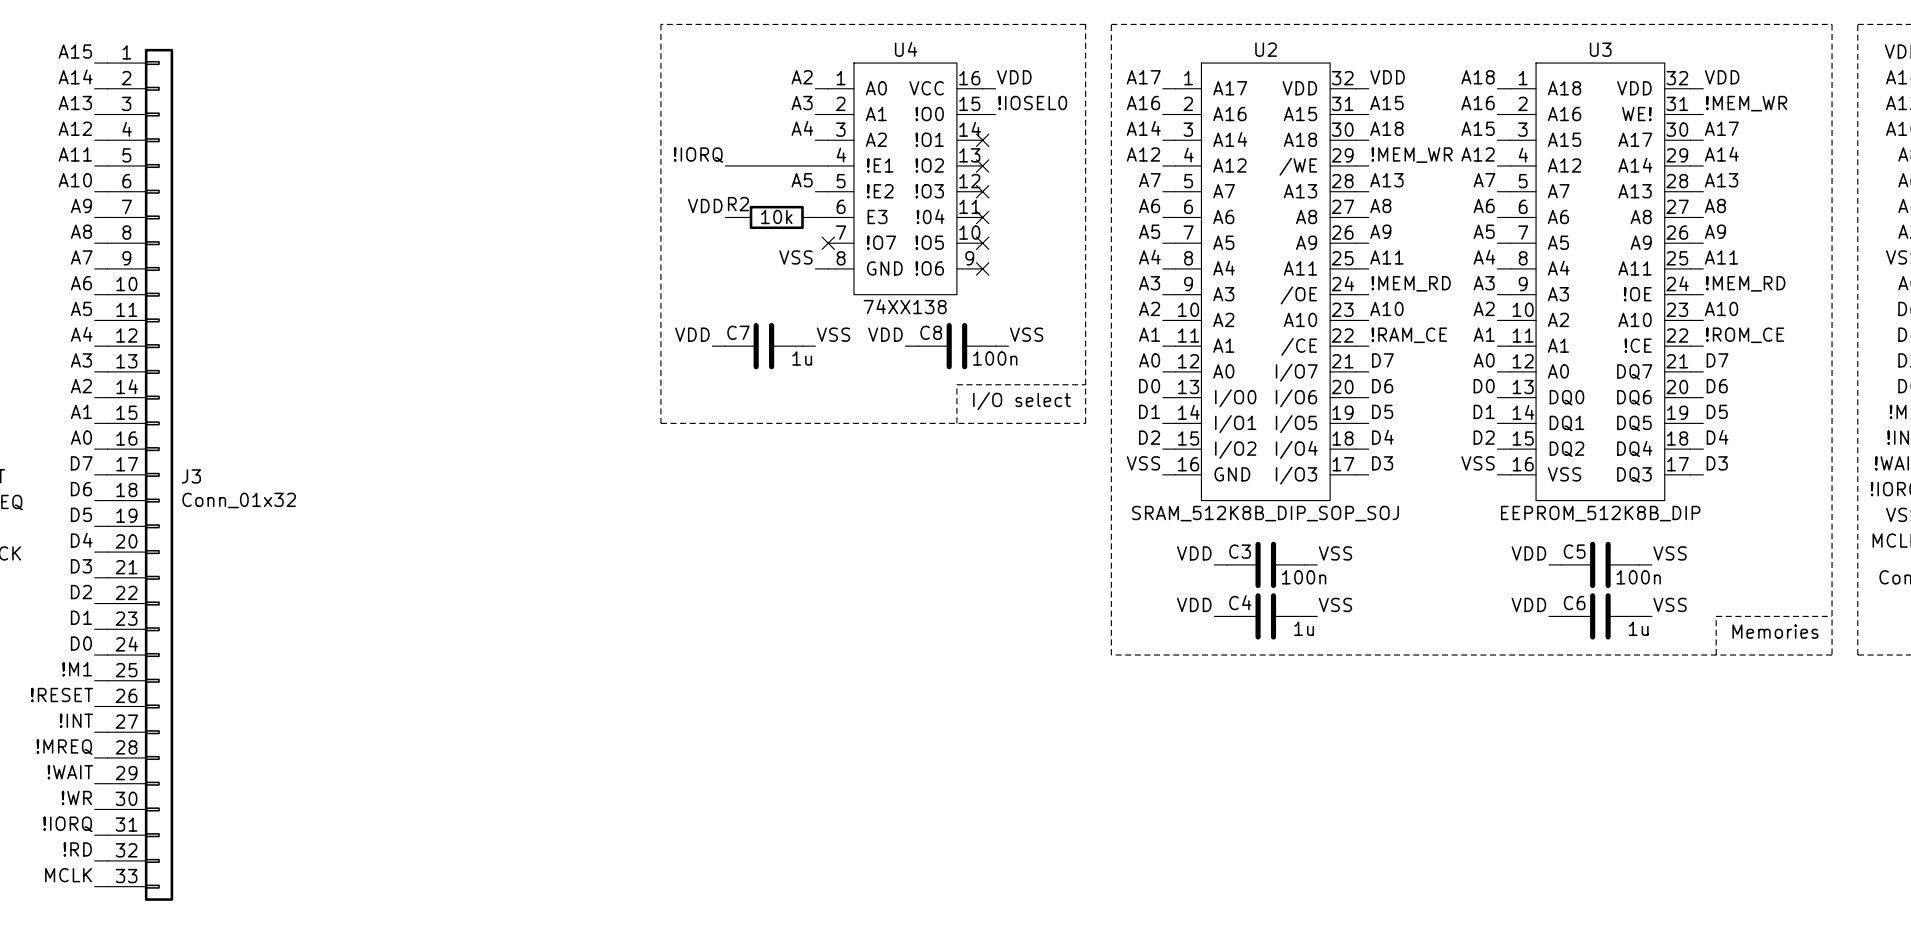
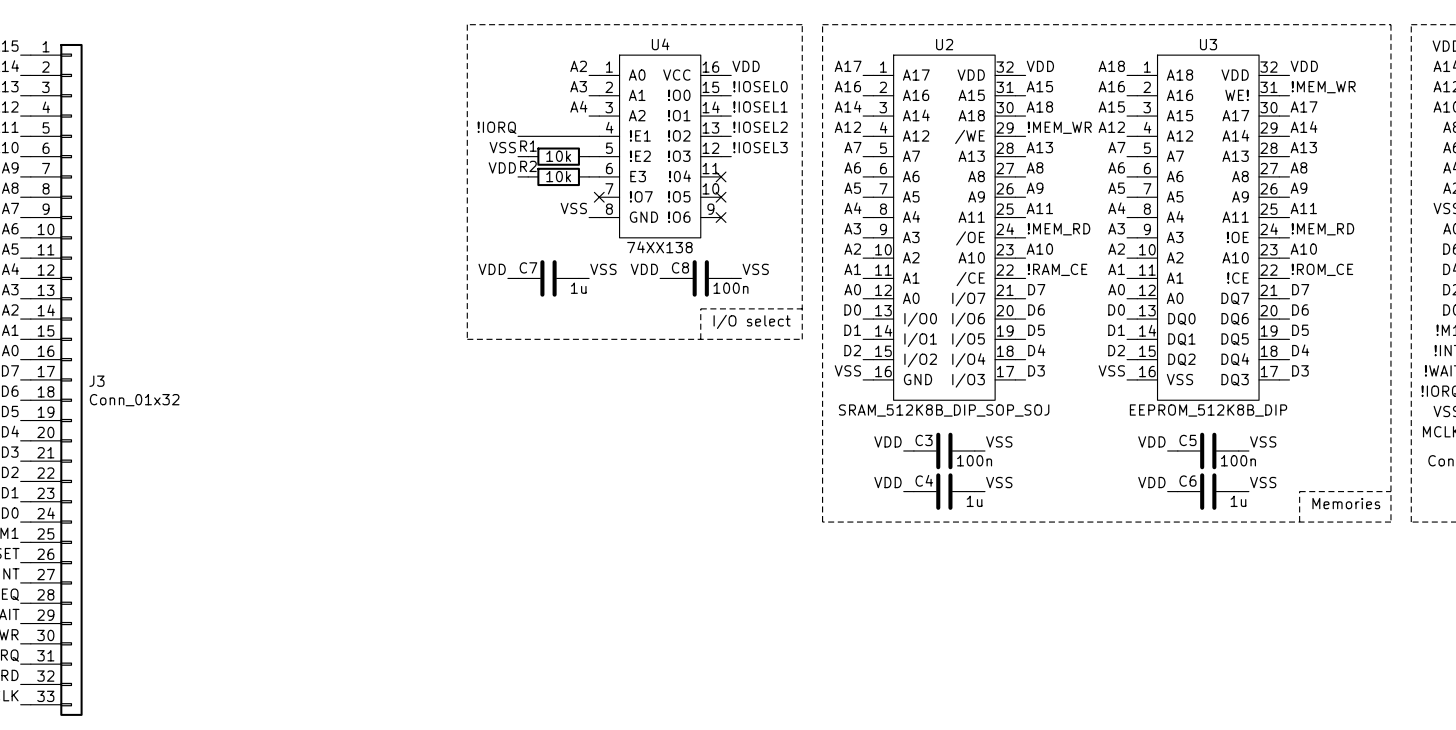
label: none -> !IOSEL1 (760, 106)
wire: none -> (721, 116) (731, 116)
no-connect mark: (982, 140) -> none
label: none -> !IOSEL2 (760, 127)
wire: none -> (721, 136) (731, 136)
no-connect mark: (982, 165) -> none
label: none -> VSS (502, 147)
label: A5 (802, 180) -> none
label: none -> !IOSEL3 (760, 147)
wire: none -> (518, 156) (528, 156)
R1: none -> 10k (558, 156)
wire: none -> (721, 156) (731, 156)
no-connect mark: (982, 191) -> none

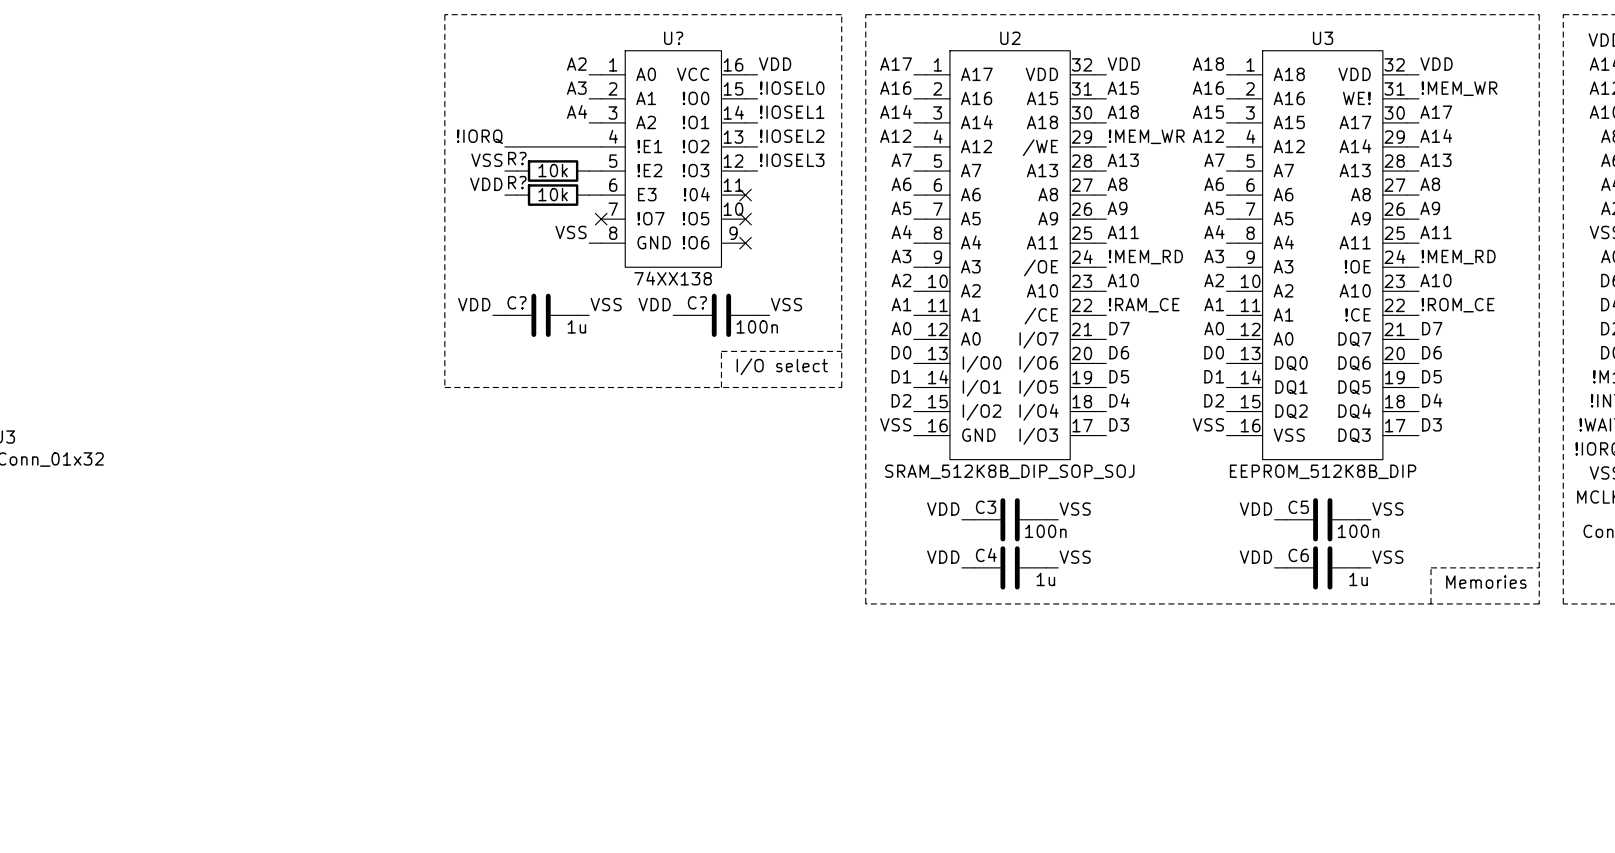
U4 name: U4 (660, 44) -> U? (673, 38)
R1 name: R1 (528, 146) -> R? (517, 158)
R2 name: R2 (528, 166) -> R? (517, 182)
C7 name: C7 (528, 267) -> C? (517, 302)
C8 name: C8 (680, 267) -> C? (697, 302)

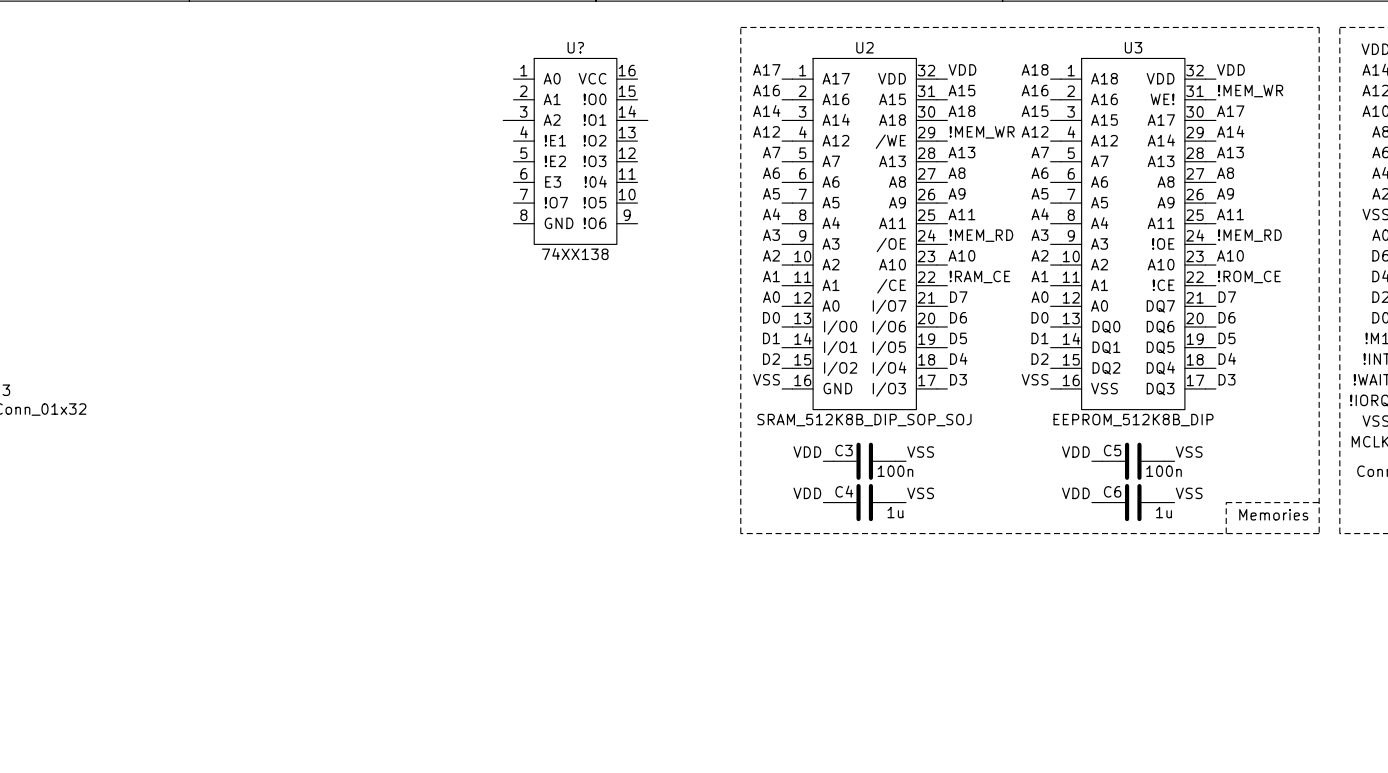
line: (444, 14) (841, 14) (841, 387) (444, 387) (444, 14) -> none
label: A2 (576, 64) -> none
label: VDD (775, 64) -> none
wire: (589, 74) (601, 74) -> none
wire: (745, 74) (757, 74) -> none
label: A3 (576, 88) -> none
label: !IOSEL0 (792, 88) -> none
wire: (589, 98) (601, 98) -> none
wire: (745, 98) (757, 98) -> none
label: A4 (577, 111) -> none
label: !IOSEL1 (792, 112) -> none
label: !IORQ (479, 136) -> none
label: !IOSEL2 (792, 136) -> none
wire: (504, 146) (601, 146) -> none
wire: (745, 146) (757, 146) -> none
label: VSS (486, 160) -> none
label: !IOSEL3 (792, 160) -> none
wire: (504, 171) (517, 171) -> none
R?: 10k (553, 171) -> none
wire: (589, 171) (601, 171) -> none
wire: (745, 171) (757, 171) -> none
label: VDD (486, 184) -> none
wire: (504, 195) (517, 195) -> none
R?: 10k (553, 195) -> none
wire: (589, 195) (601, 195) -> none
no-connect mark: (745, 195) -> none
no-connect mark: (601, 219) -> none
no-connect mark: (745, 219) -> none
label: VSS (571, 232) -> none
wire: (589, 243) (601, 243) -> none
no-connect mark: (745, 243) -> none
label: VDD (474, 304) -> none
label: VSS (606, 304) -> none
label: VDD (654, 304) -> none
label: VSS (786, 304) -> none
wire: (492, 315) (504, 315) -> none
C?: 1u (541, 315) -> none
wire: (577, 315) (589, 315) -> none
wire: (673, 315) (685, 315) -> none
C?: 100n (721, 315) -> none
wire: (757, 315) (769, 315) -> none
line: (841, 351) (721, 351) (721, 387) -> none
text: I/O select (782, 366) -> none

